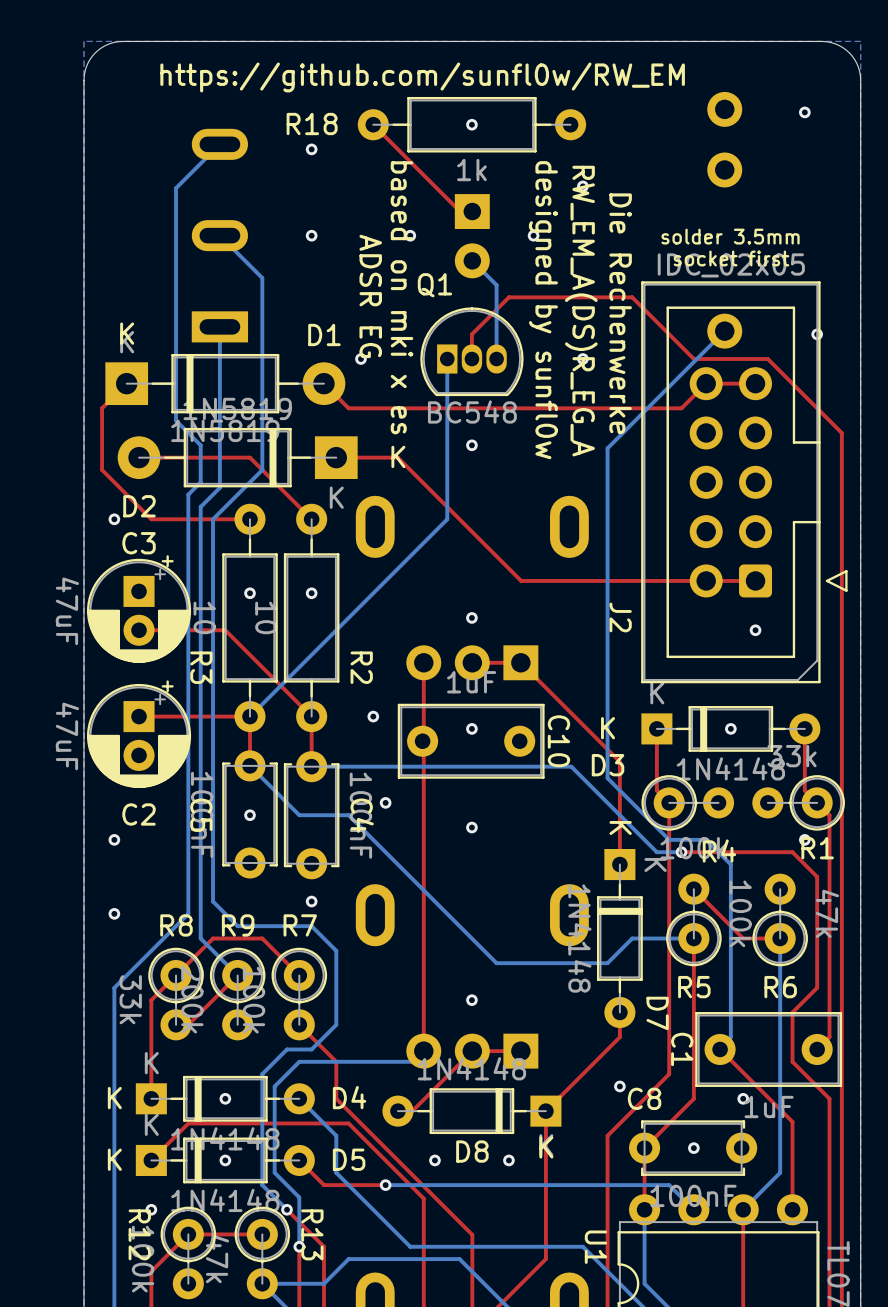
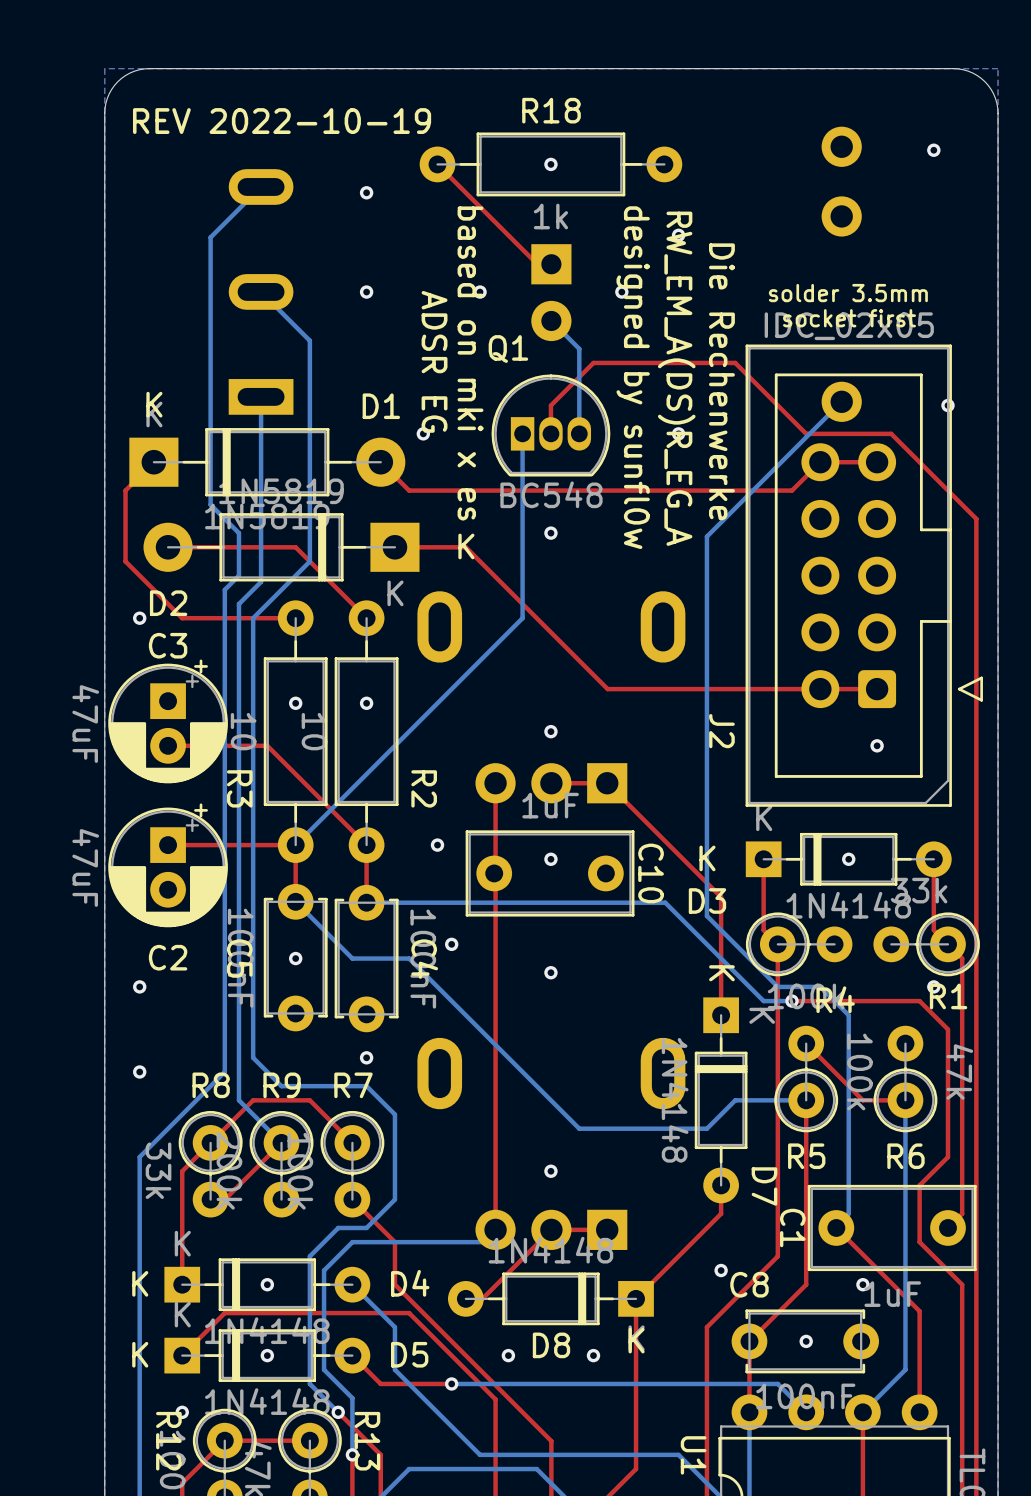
text: https://github.com/sunfl0w/RW_EM (422, 77) -> none
text: none -> REV 2022-10-19 (282, 121)
R18 name position: R18 (312, 124) -> R18 (551, 110)

